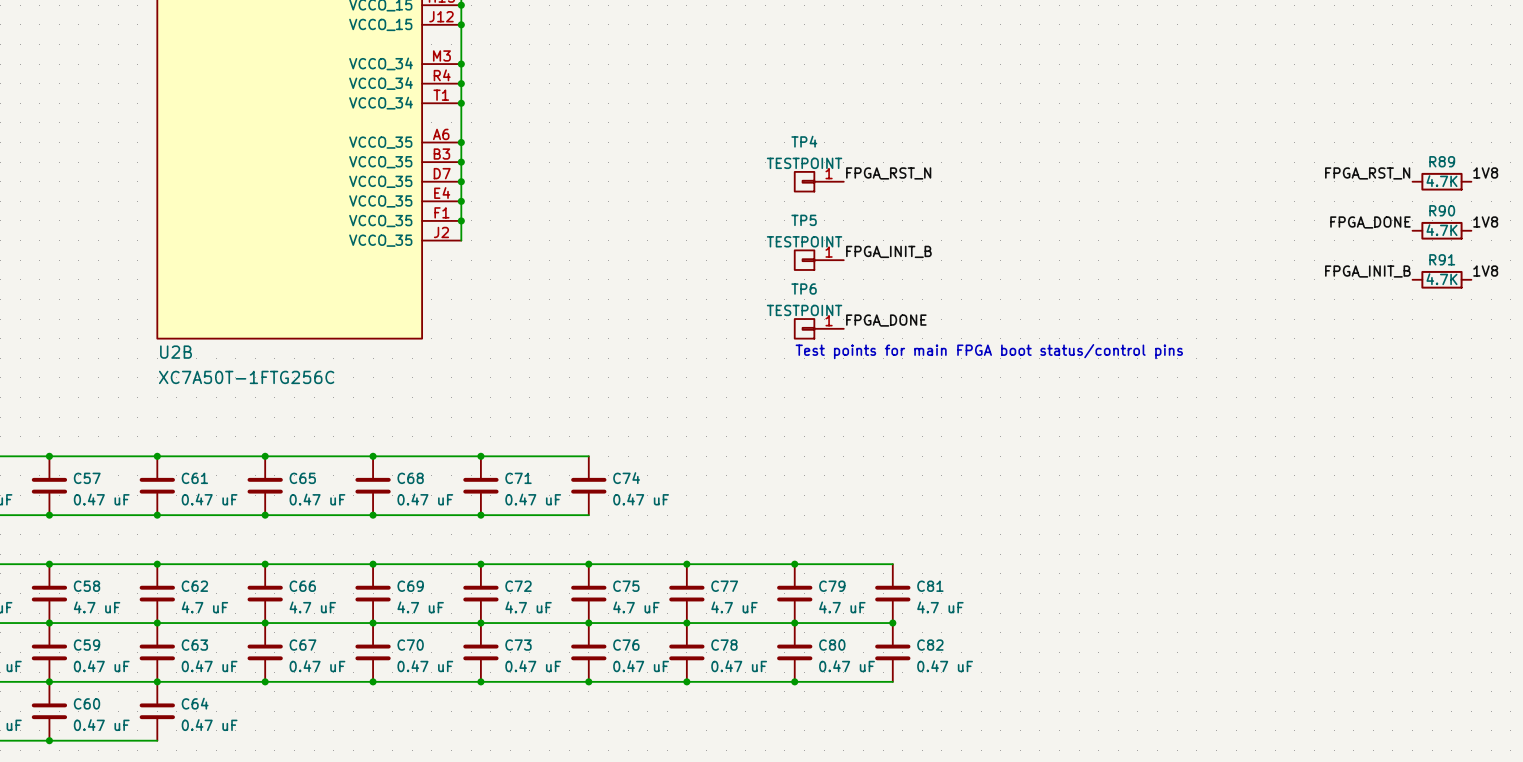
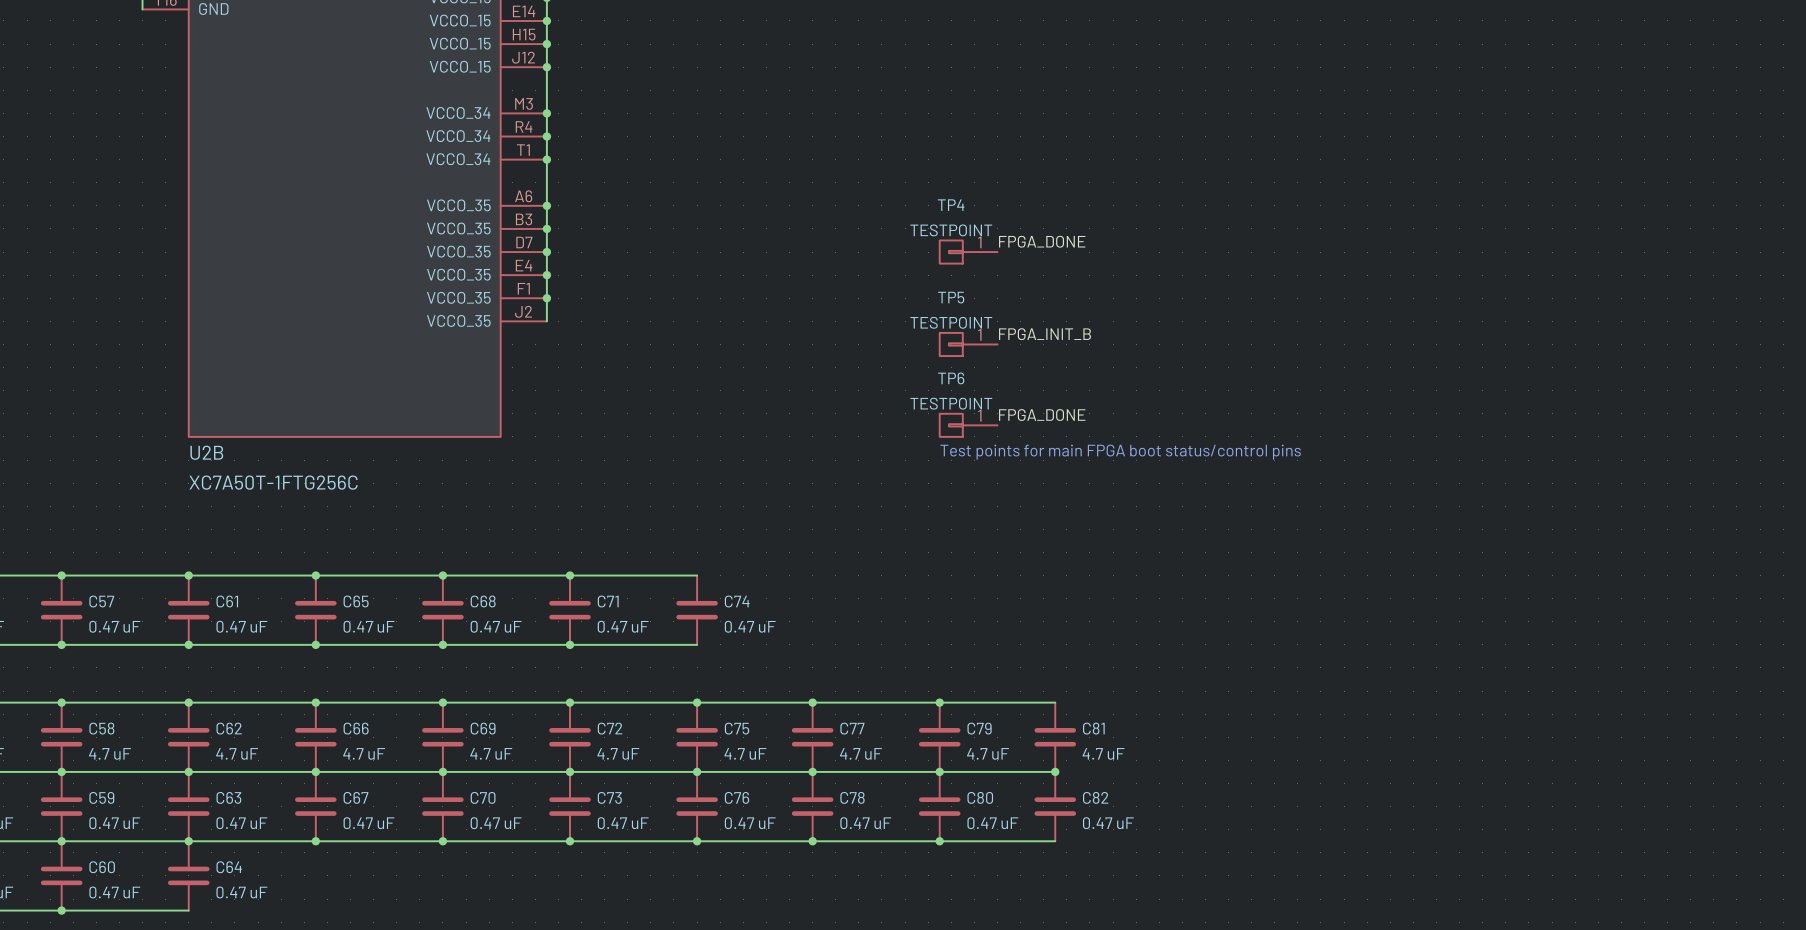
label: 1V8 (1485, 172) -> none
label: FPGA_RST_N (888, 173) -> FPGA_DONE (1042, 241)
label: FPGA_RST_N (1367, 173) -> none
R89: 4.7K (1441, 181) -> none
label: FPGA_DONE (1370, 222) -> none
label: 1V8 (1485, 222) -> none
R90: 4.7K (1441, 230) -> none
label: FPGA_INIT_B (1367, 271) -> none
label: 1V8 (1485, 271) -> none
R91: 4.7K (1441, 279) -> none

